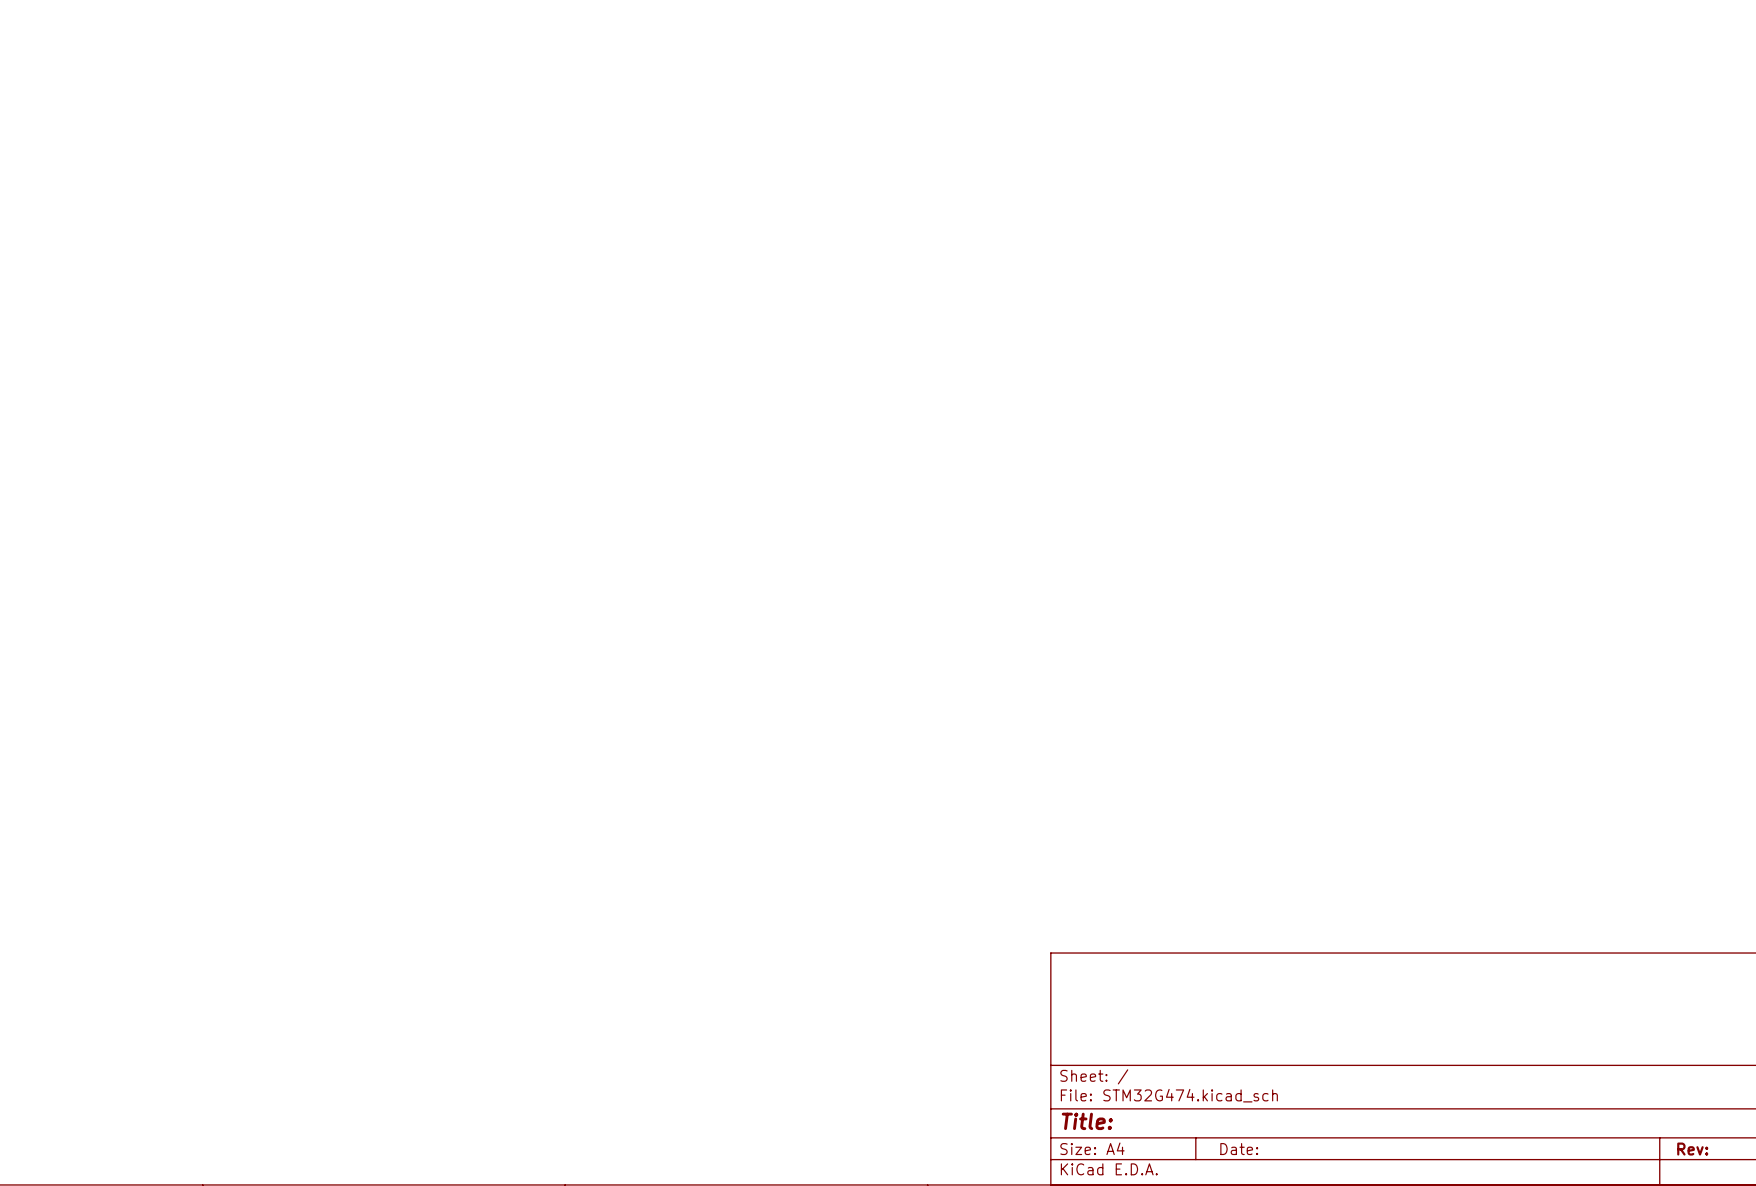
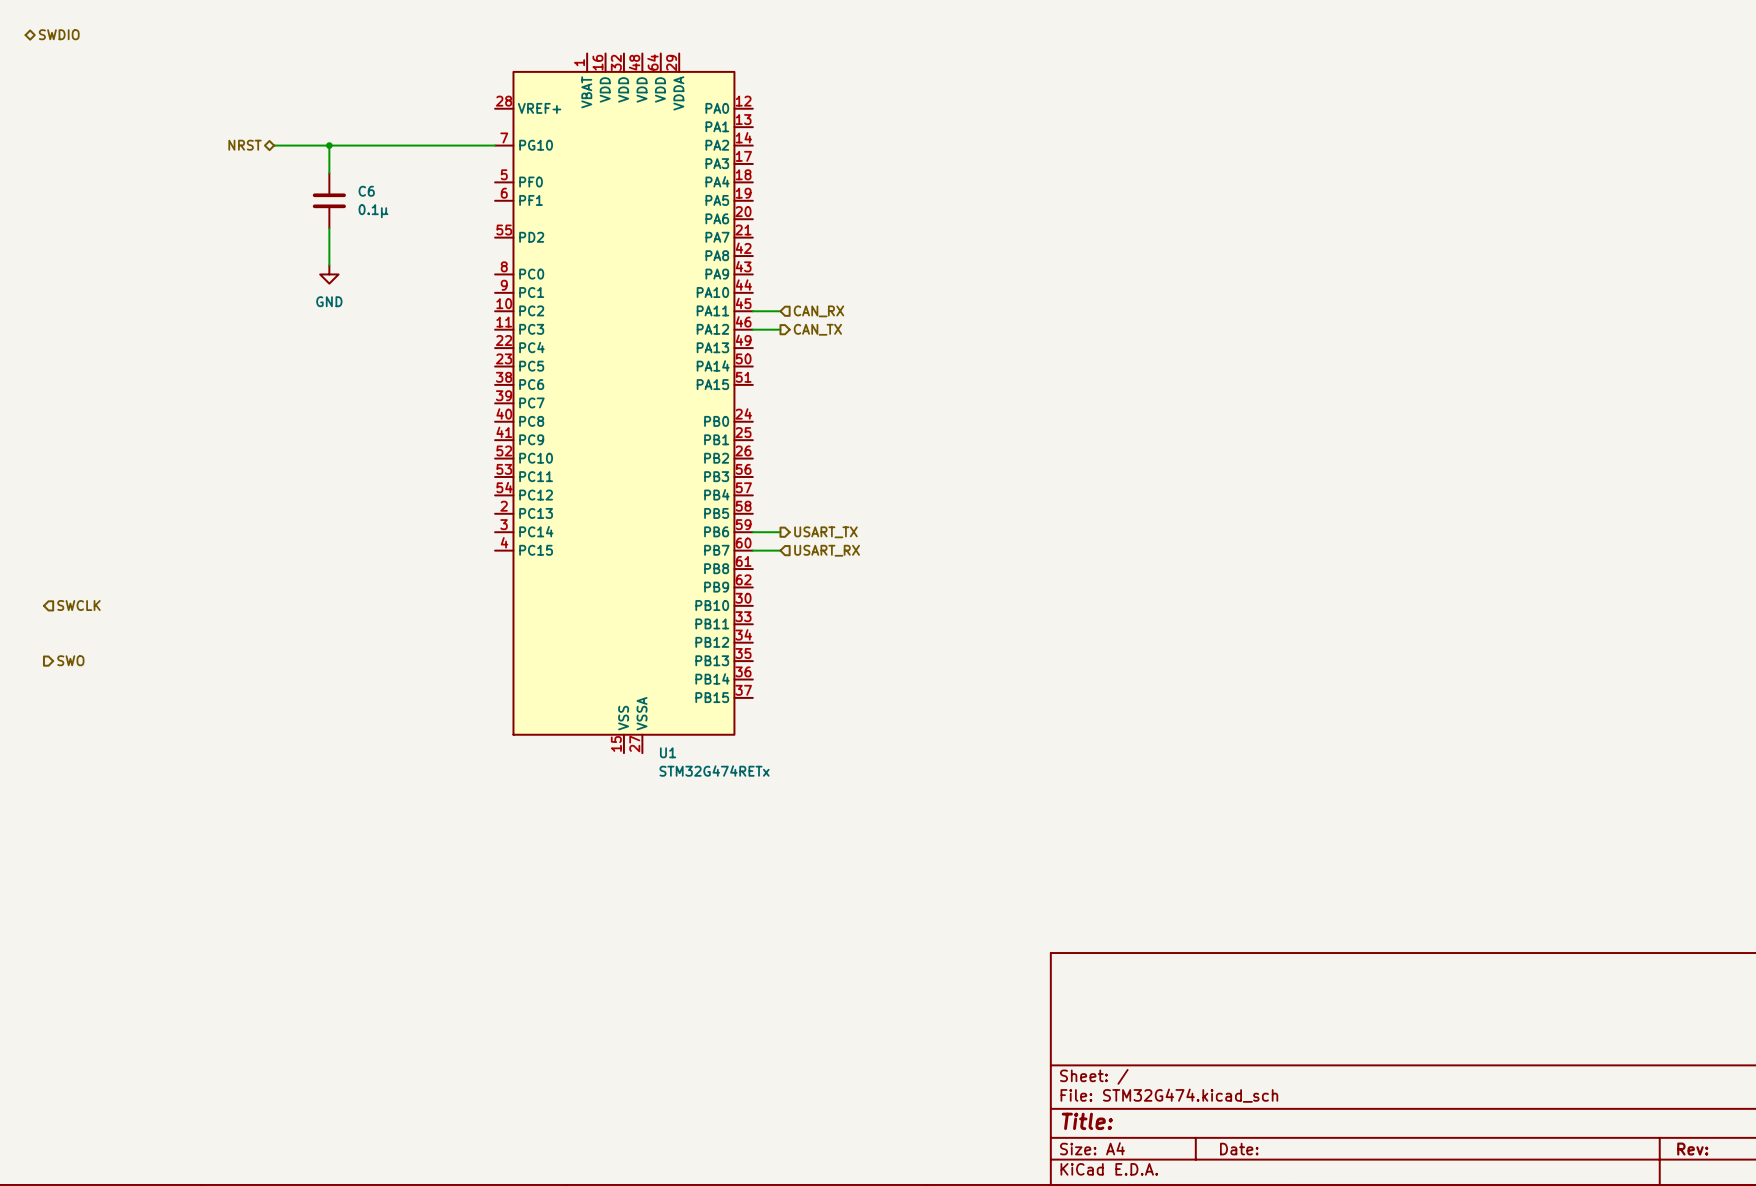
hierarchical label: none -> SWDIO (59, 34)
hierarchical label: none -> NRST (245, 145)
wire: none -> (274, 145) (495, 145)
wire: none -> (329, 145) (329, 173)
junction: none -> (329, 145)
C6: none -> 0.1μ (329, 200)
wire: none -> (329, 228) (329, 265)
power symbol: none -> GND (329, 274)
wire: none -> (752, 311) (780, 311)
hierarchical label: none -> CAN_RX (818, 311)
wire: none -> (752, 329) (780, 329)
hierarchical label: none -> CAN_TX (817, 329)
U1: none -> STM32G474RETx (623, 403)
wire: none -> (752, 532) (780, 532)
hierarchical label: none -> USART_TX (825, 532)
wire: none -> (752, 550) (780, 550)
hierarchical label: none -> USART_RX (827, 550)
hierarchical label: none -> SWCLK (78, 605)
hierarchical label: none -> SWO (70, 660)

